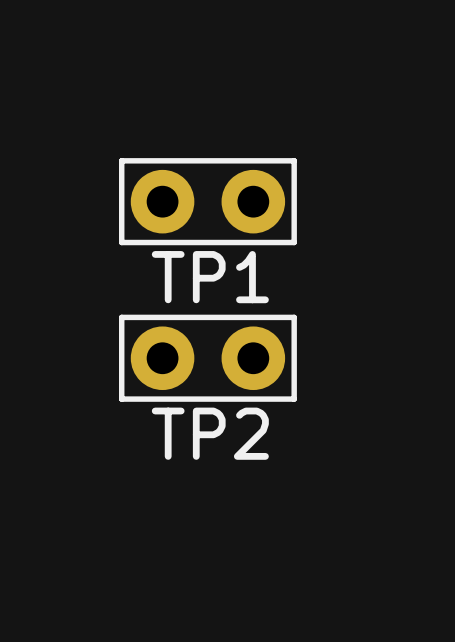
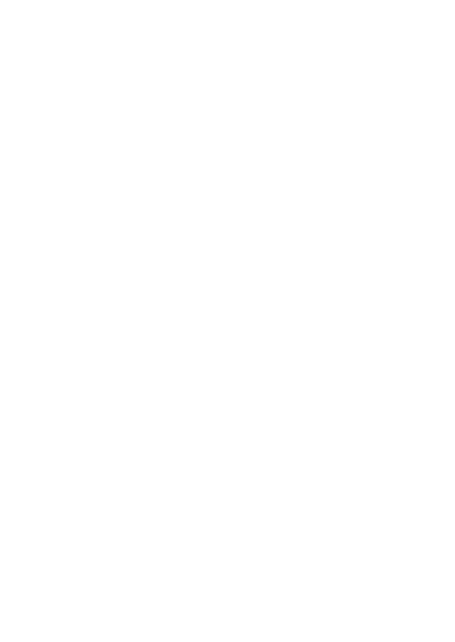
TP1: (207, 201) -> none
TP2: (207, 358) -> none

